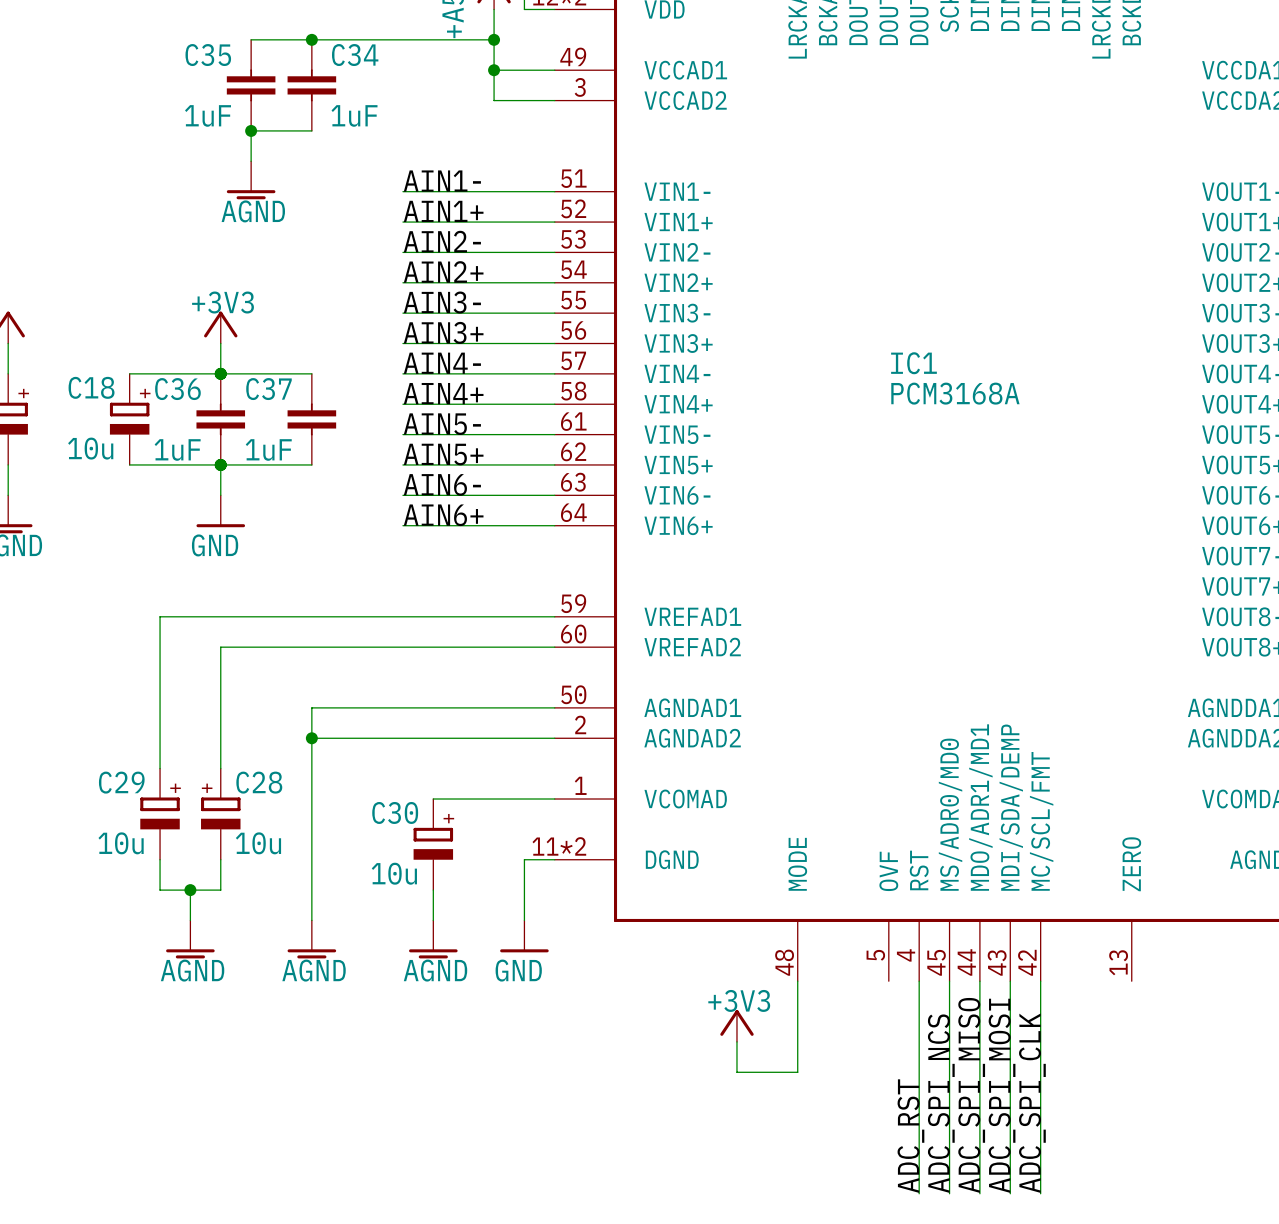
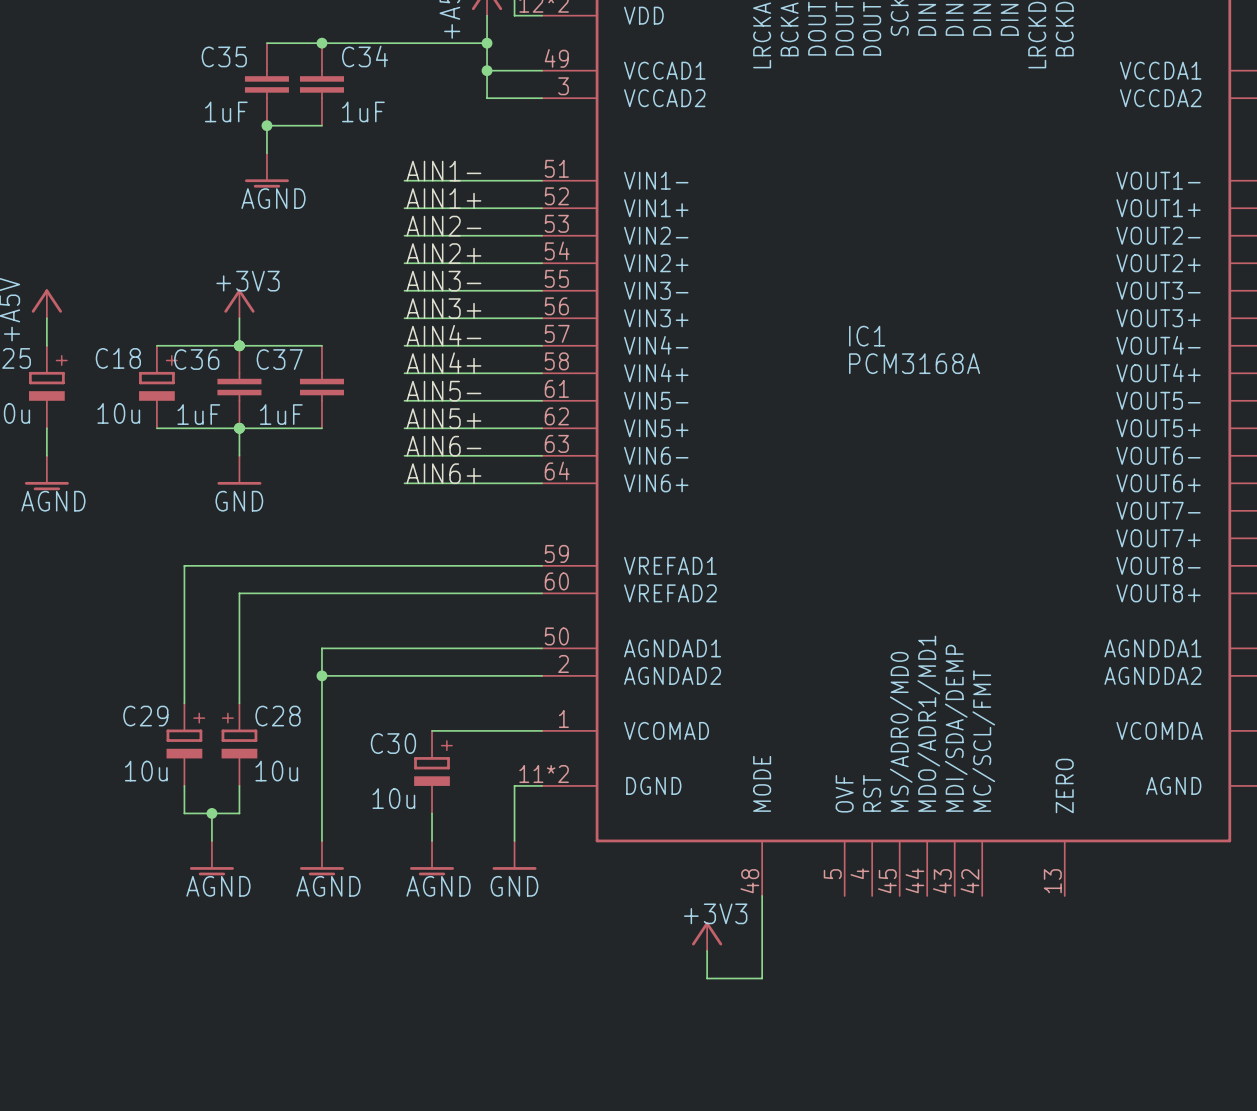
wire: (919, 981) (919, 1193) -> none
wire: (949, 981) (949, 1193) -> none
wire: (979, 981) (979, 1193) -> none
wire: (1010, 981) (1010, 1193) -> none
wire: (1040, 981) (1040, 1193) -> none
label: ADC_SPI_MISO (971, 1095) -> none
label: ADC_SPI_MOSI (1002, 1095) -> none
label: ADC_SPI_NCS (941, 1103) -> none
label: ADC_SPI_CLK (1032, 1103) -> none
label: ADC_RST (910, 1136) -> none

